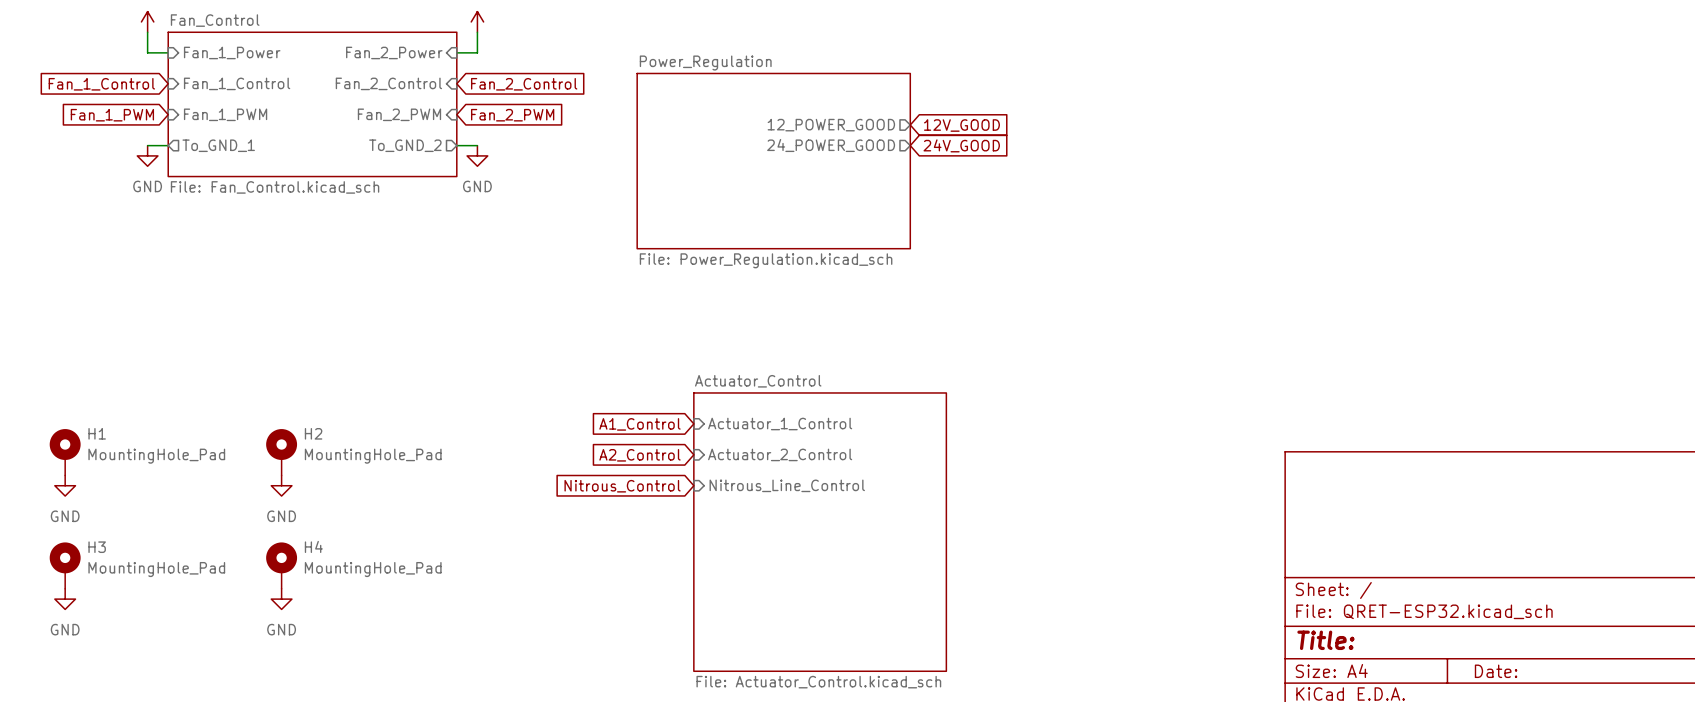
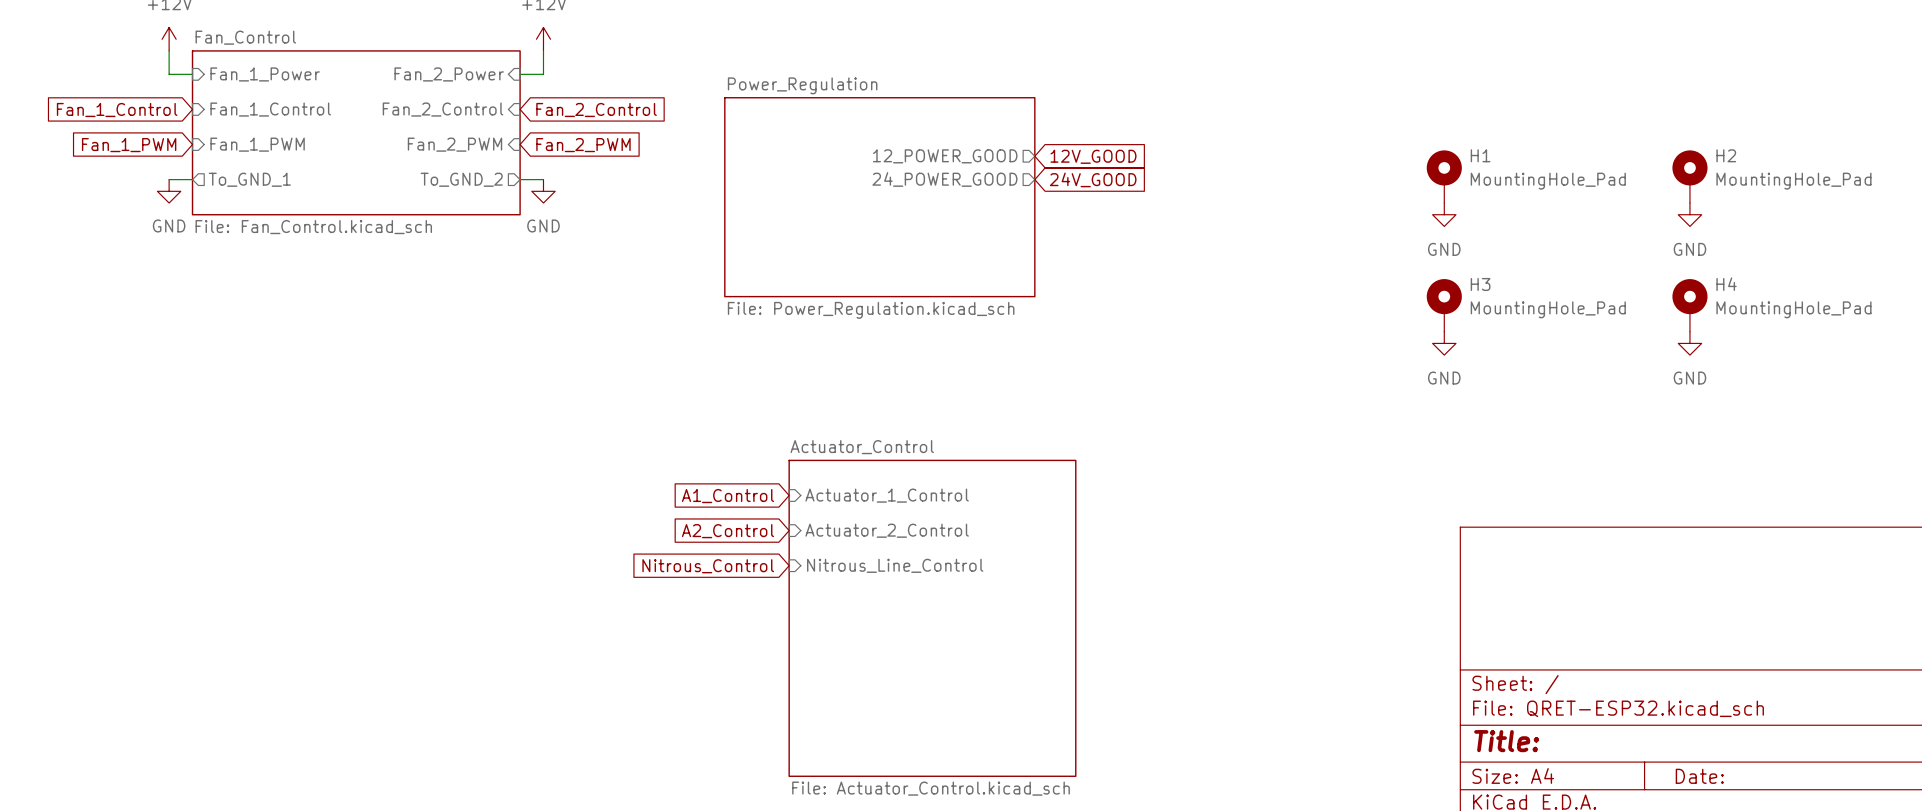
power symbol: none -> GND (1444, 214)
power symbol: none -> GND (1689, 214)
power symbol: none -> GND (1444, 343)
power symbol: none -> GND (1689, 343)
H1 position: (65, 452) -> (1444, 176)
H2 position: (281, 452) -> (1689, 176)
power symbol: GND (65, 485) -> none
power symbol: GND (281, 485) -> none
H3 position: (65, 565) -> (1444, 305)
H4 position: (281, 565) -> (1689, 305)
power symbol: GND (65, 599) -> none
power symbol: GND (281, 599) -> none

